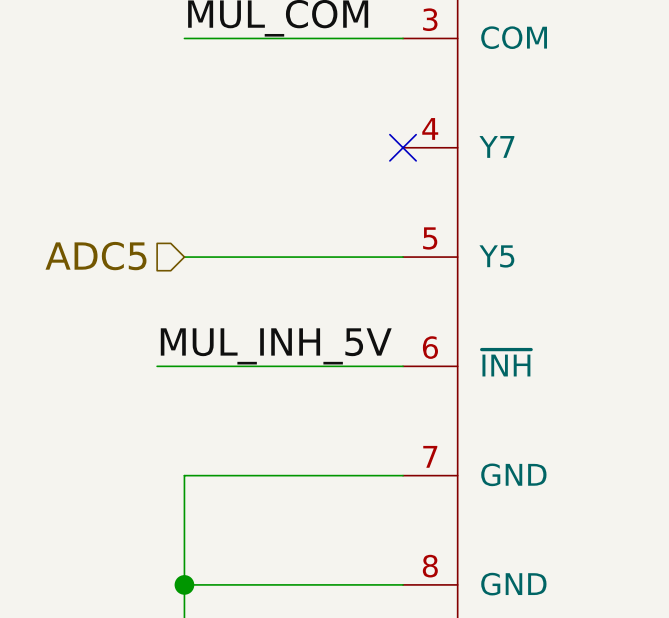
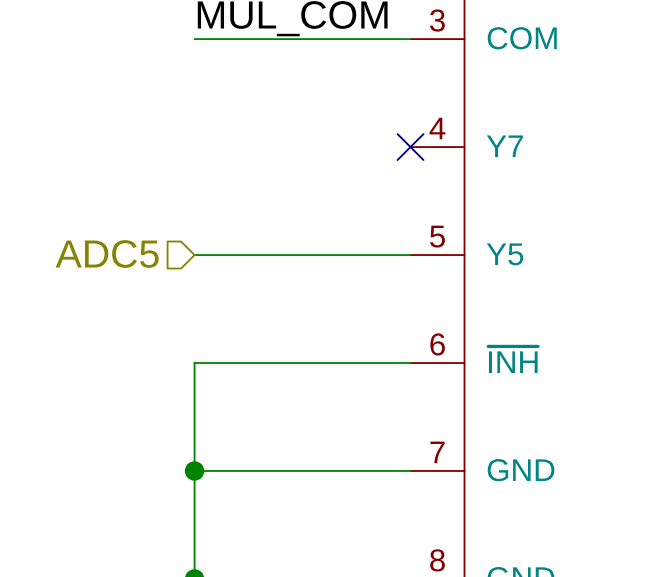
label: MUL_INH_5V (276, 346) -> none
wire: (157, 366) (184, 366) -> (194, 470) (194, 363)
junction: none -> (194, 470)

